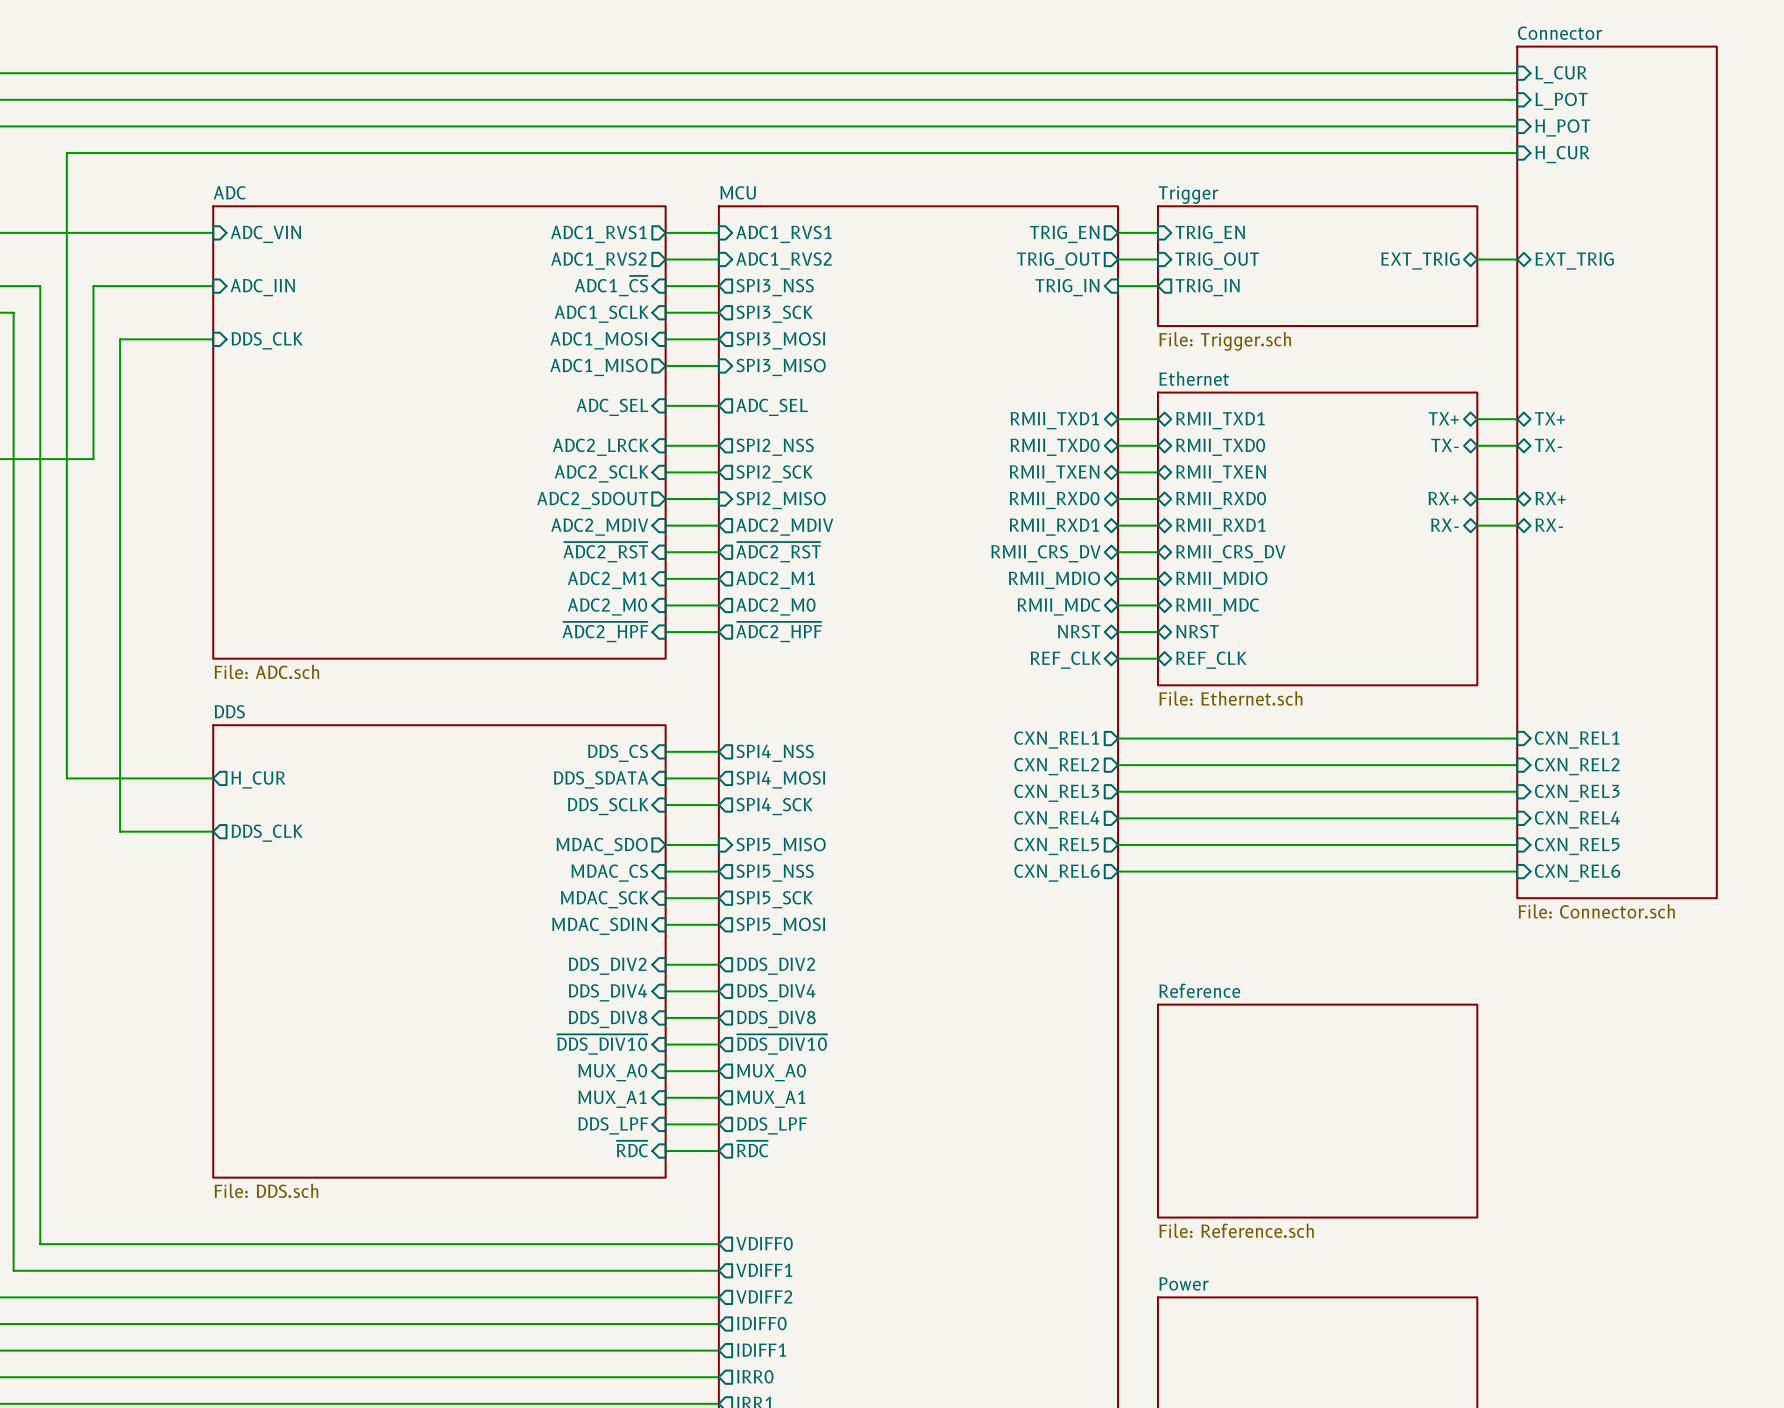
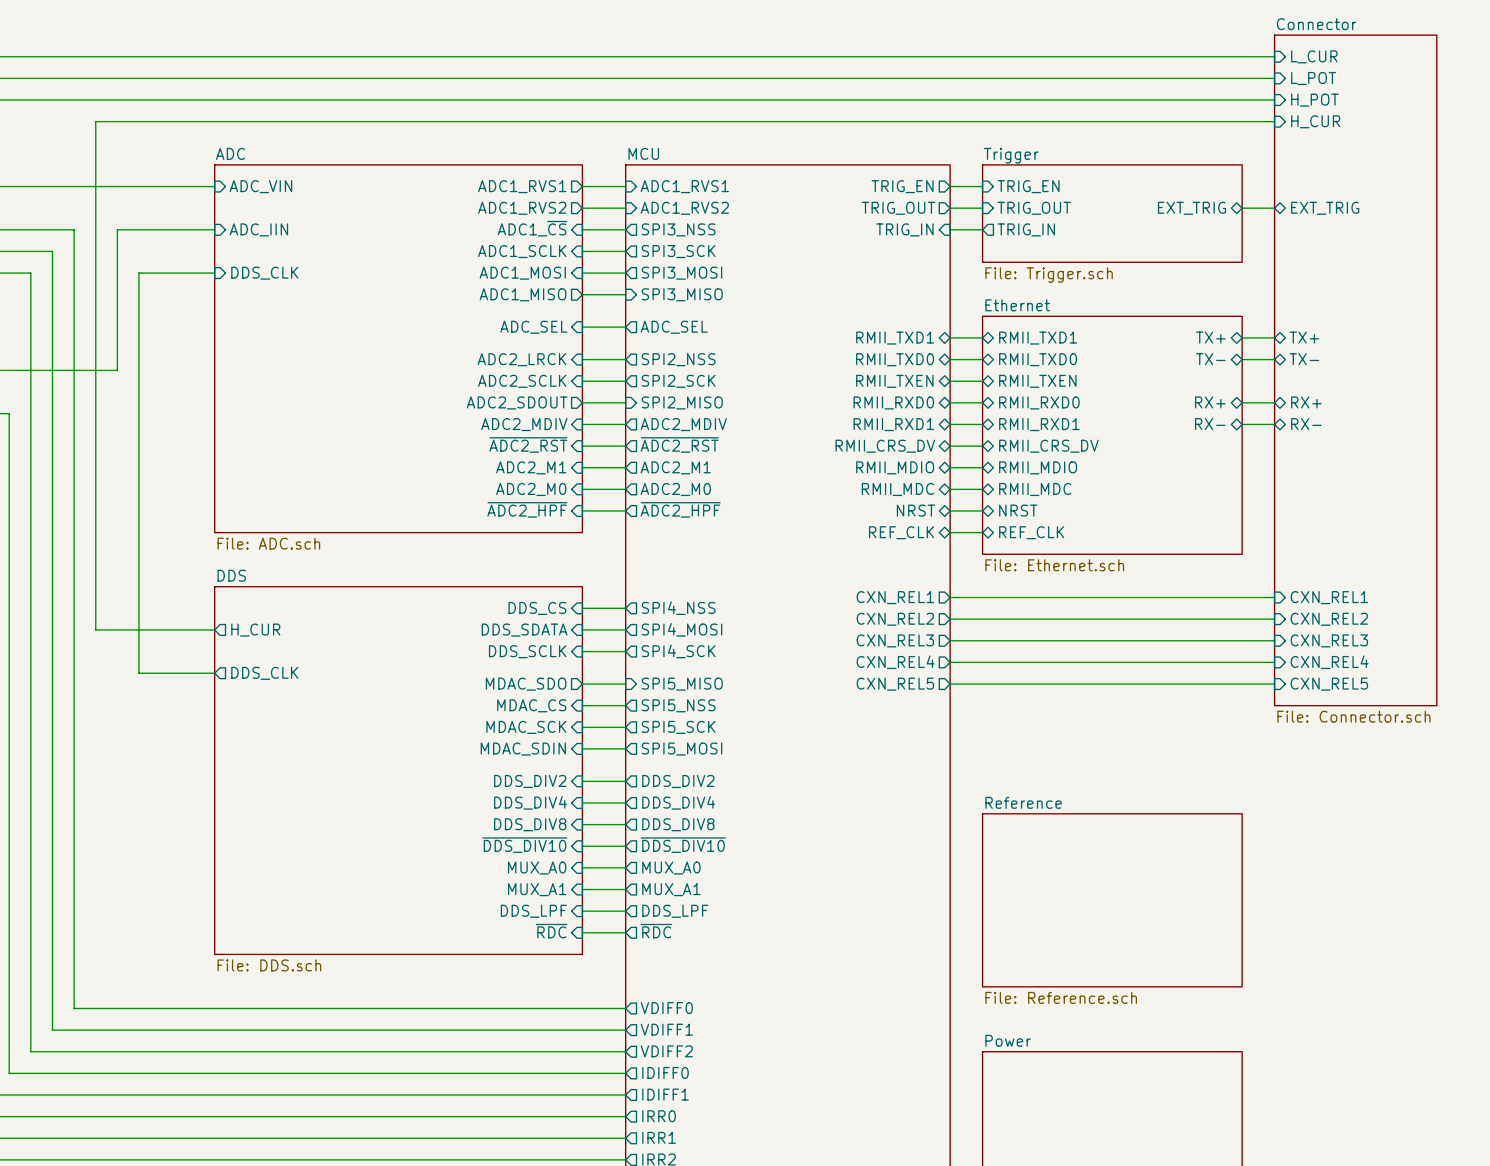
sheet Connector: none -> File: Connector.sch (1355, 370)
sheet Connector: File: Connector.sch (1617, 472) -> none
wire: (1118, 871) (1517, 871) -> none
sheet pin: CXN_REL6 (1057, 873) -> none
sheet pin: CXN_REL6 (1577, 873) -> none

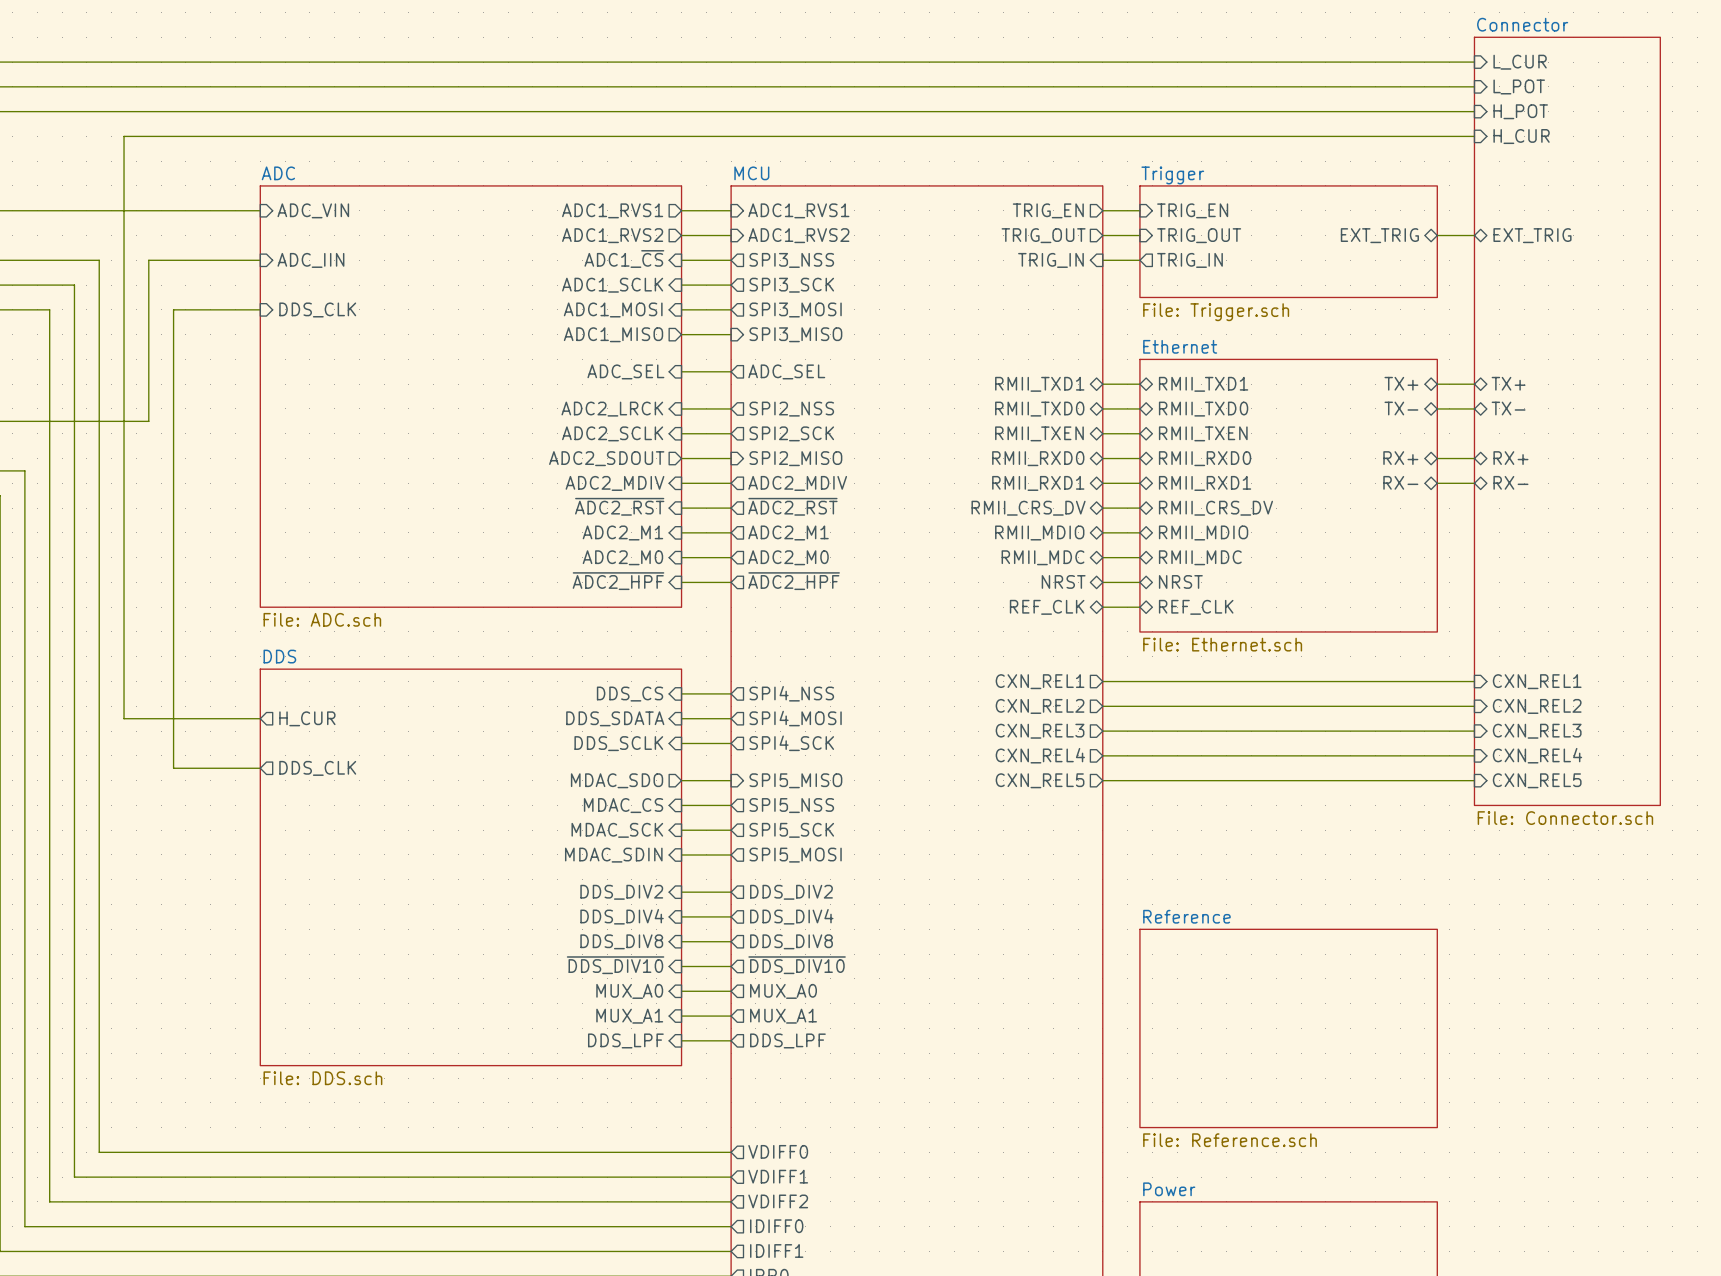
sheet DDS: none -> File: DDS.sch (470, 867)
sheet DDS: File: DDS.sch (398, 770) -> none
sheet pin: ~{RDC} (551, 931) -> none
sheet pin: ~{RDC} (656, 931) -> none
wire: (582, 932) (625, 932) -> none

